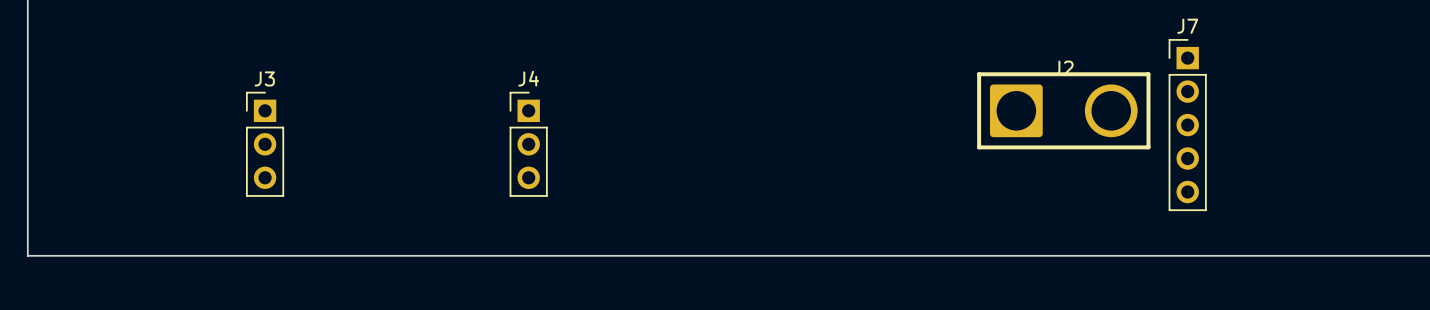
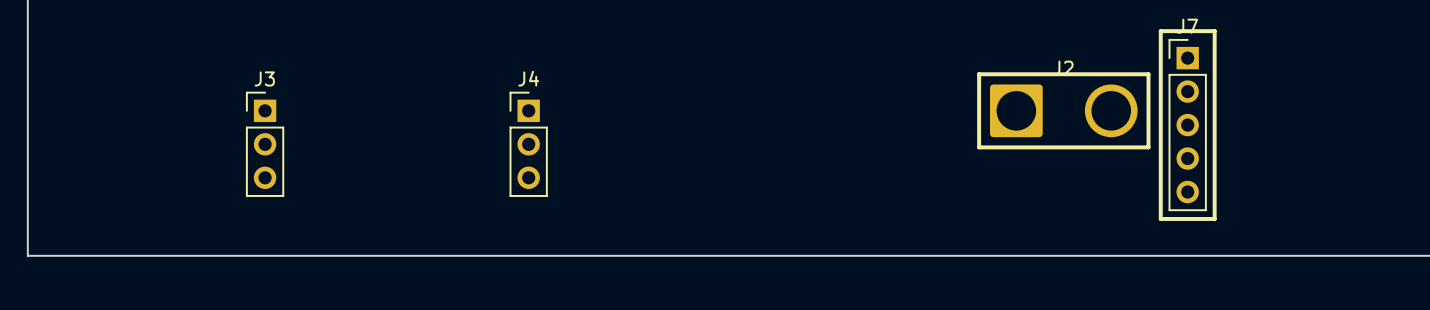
line: none -> (1160, 31) (1214, 31) (1214, 218) (1160, 218) (1160, 31)

